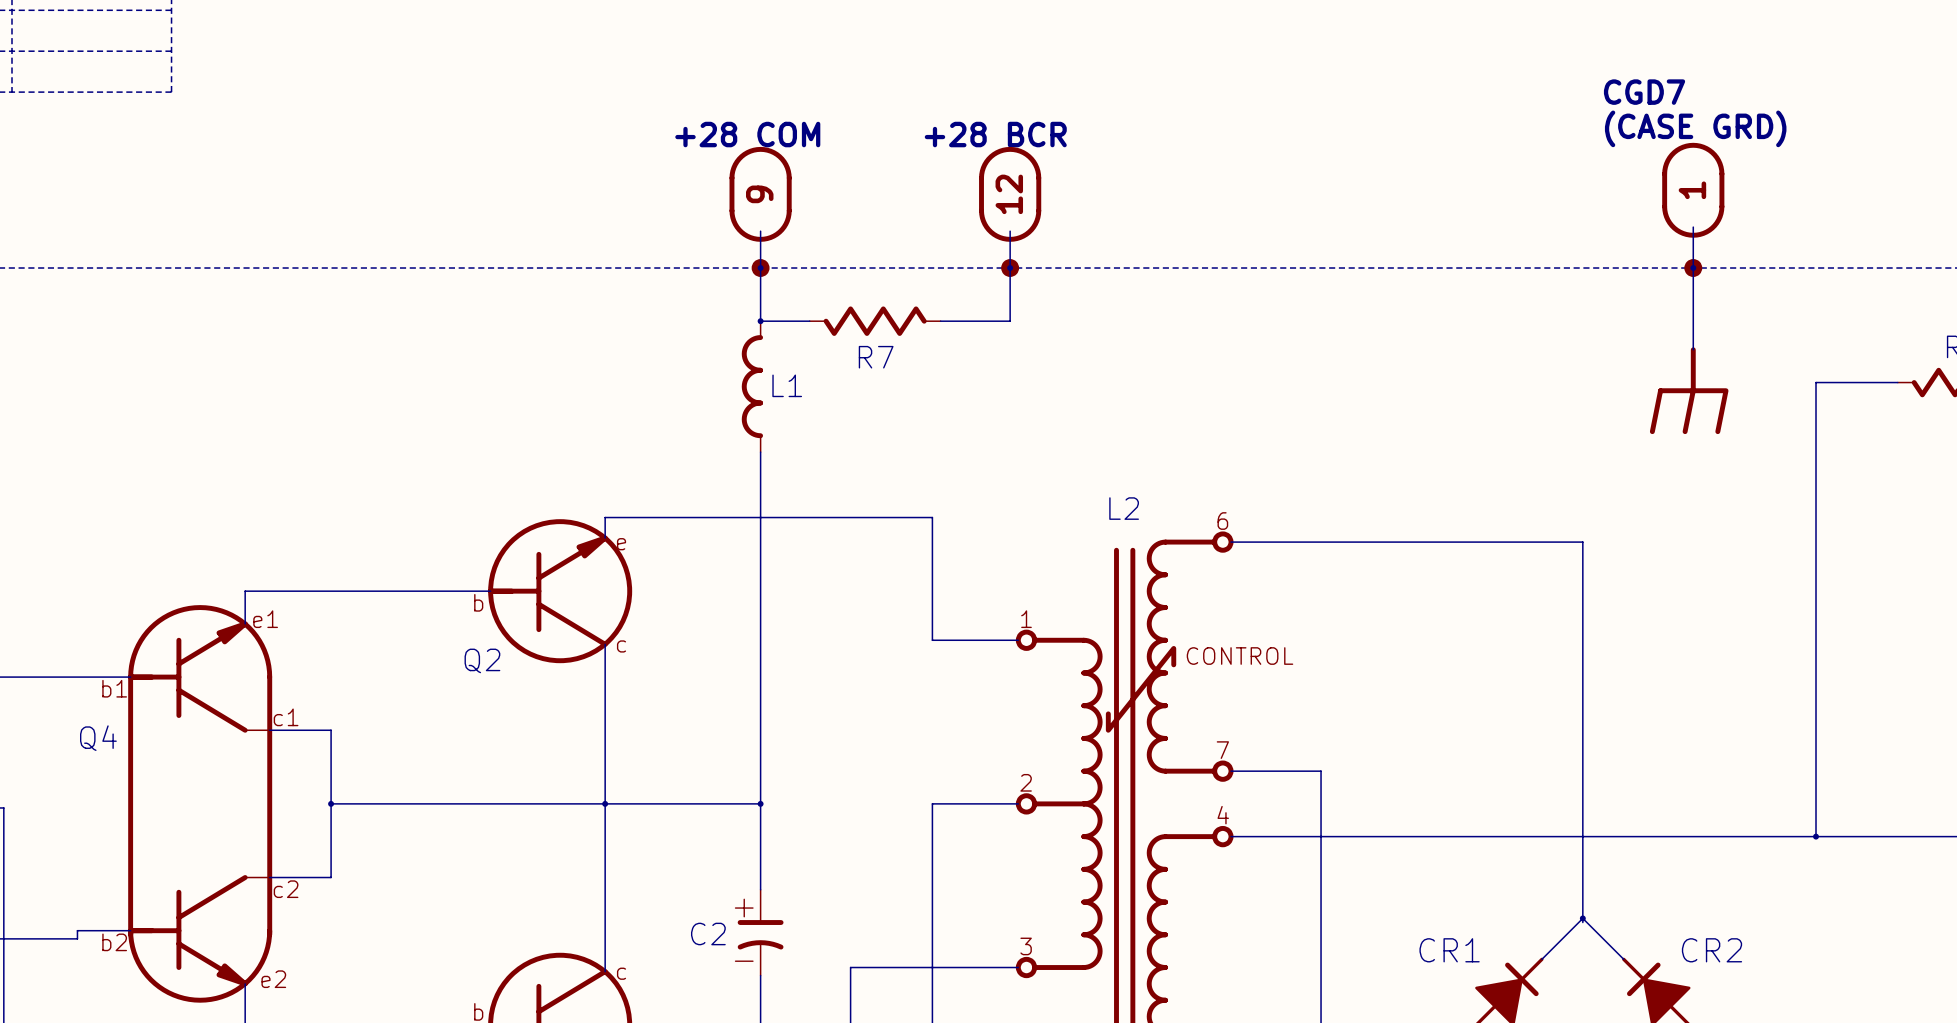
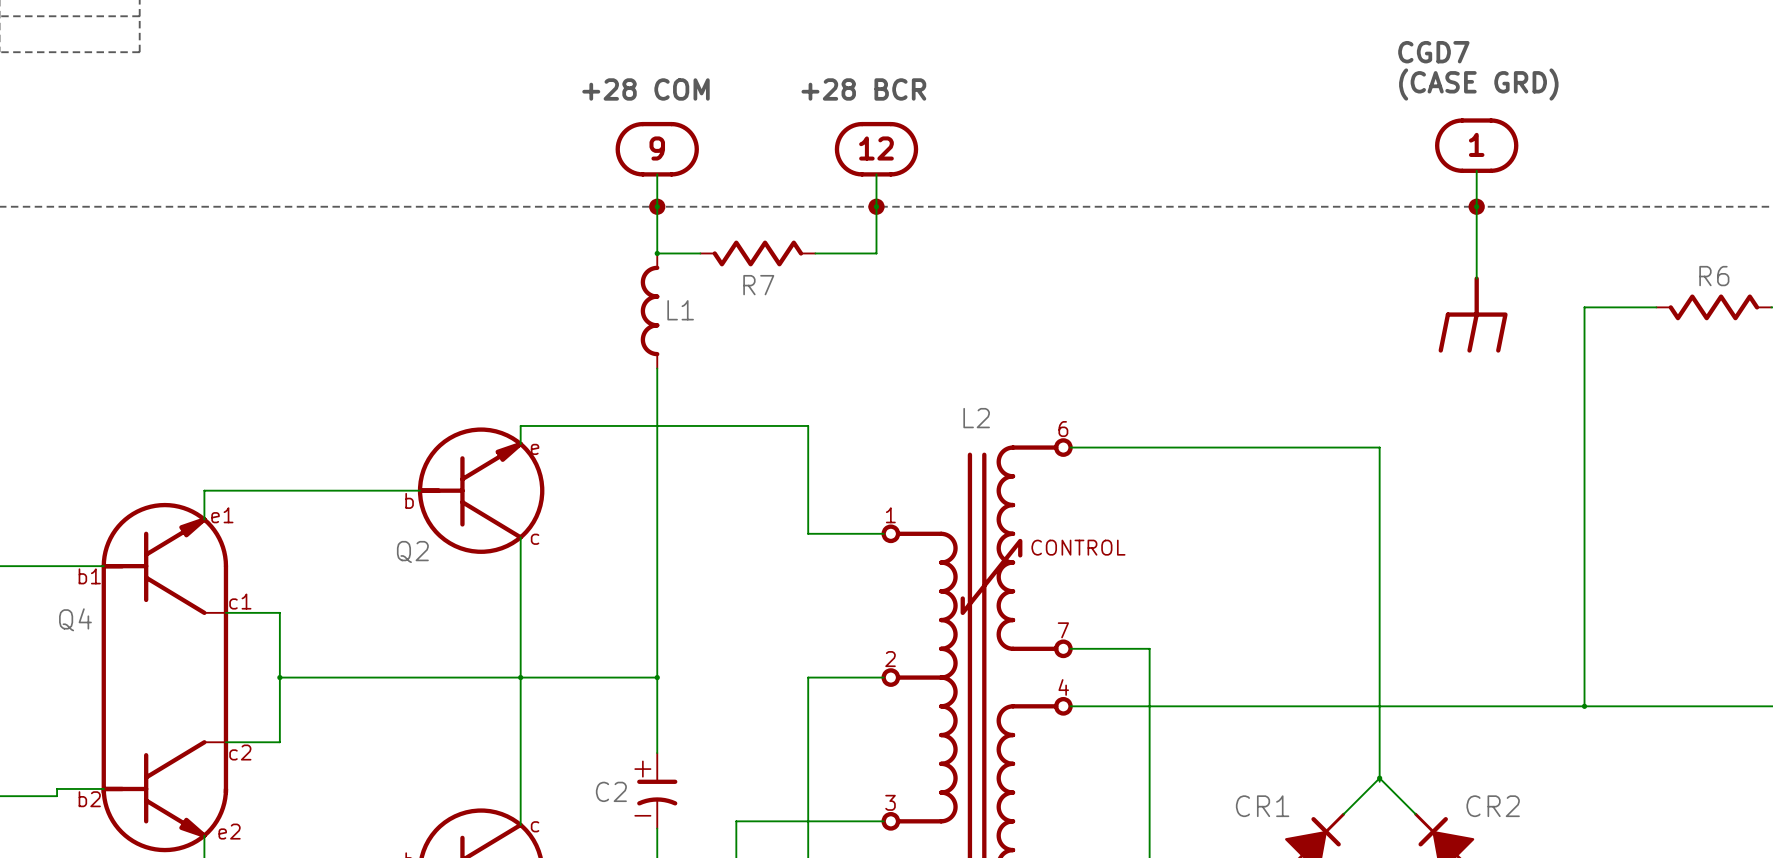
part rotation: 0° (1693, 190) -> 90° clockwise (1476, 145)
part rotation: 0° (760, 194) -> 90° clockwise (657, 149)
part rotation: 0° (1010, 194) -> 90° clockwise (876, 149)

